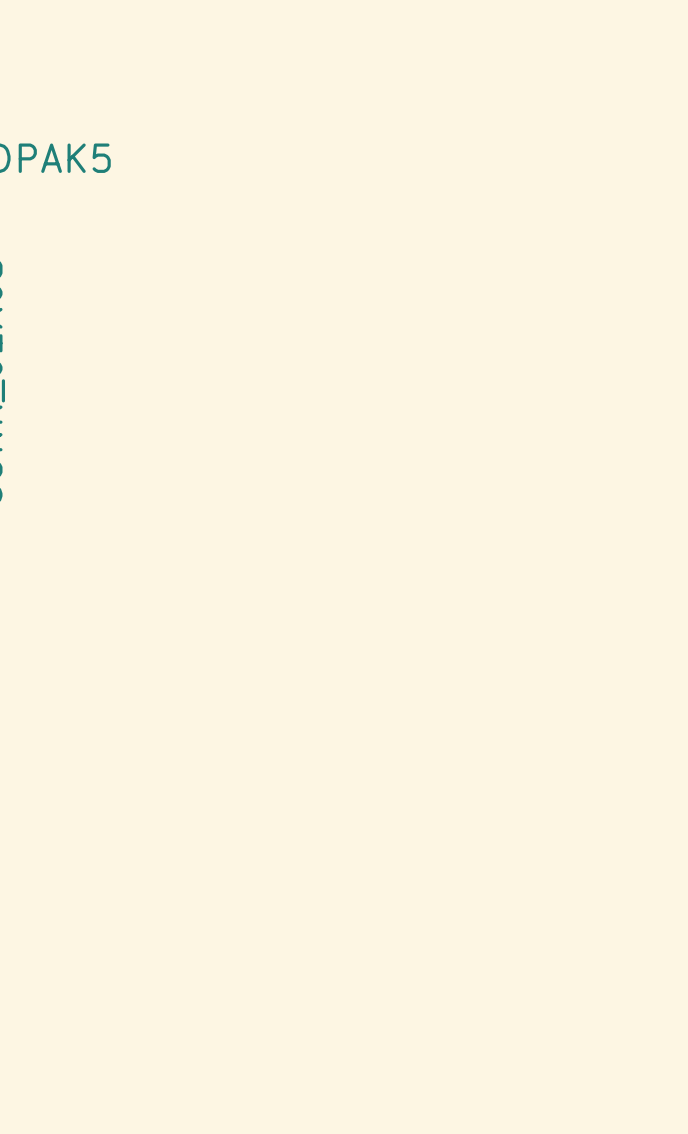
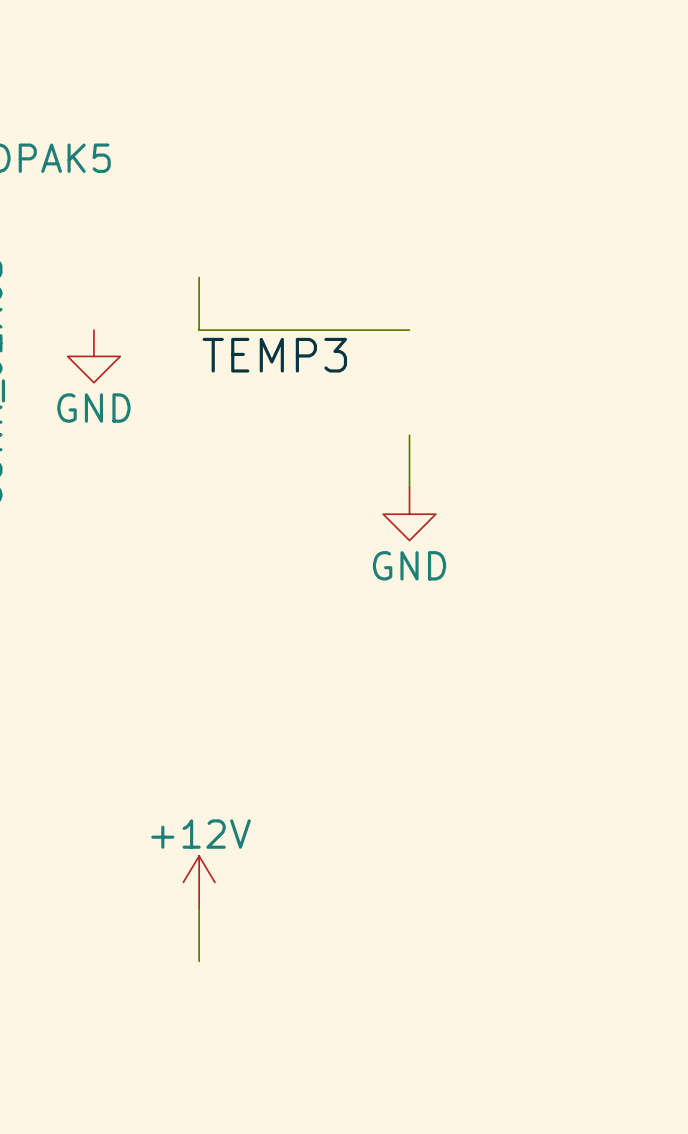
wire: none -> (199, 277) (199, 330) (409, 330)
label: none -> TEMP3 (274, 355)
power symbol: none -> GND (93, 356)
wire: none -> (409, 435) (409, 487)
power symbol: none -> GND (409, 514)
power symbol: none -> +12V (199, 882)
wire: none -> (199, 908) (199, 961)

